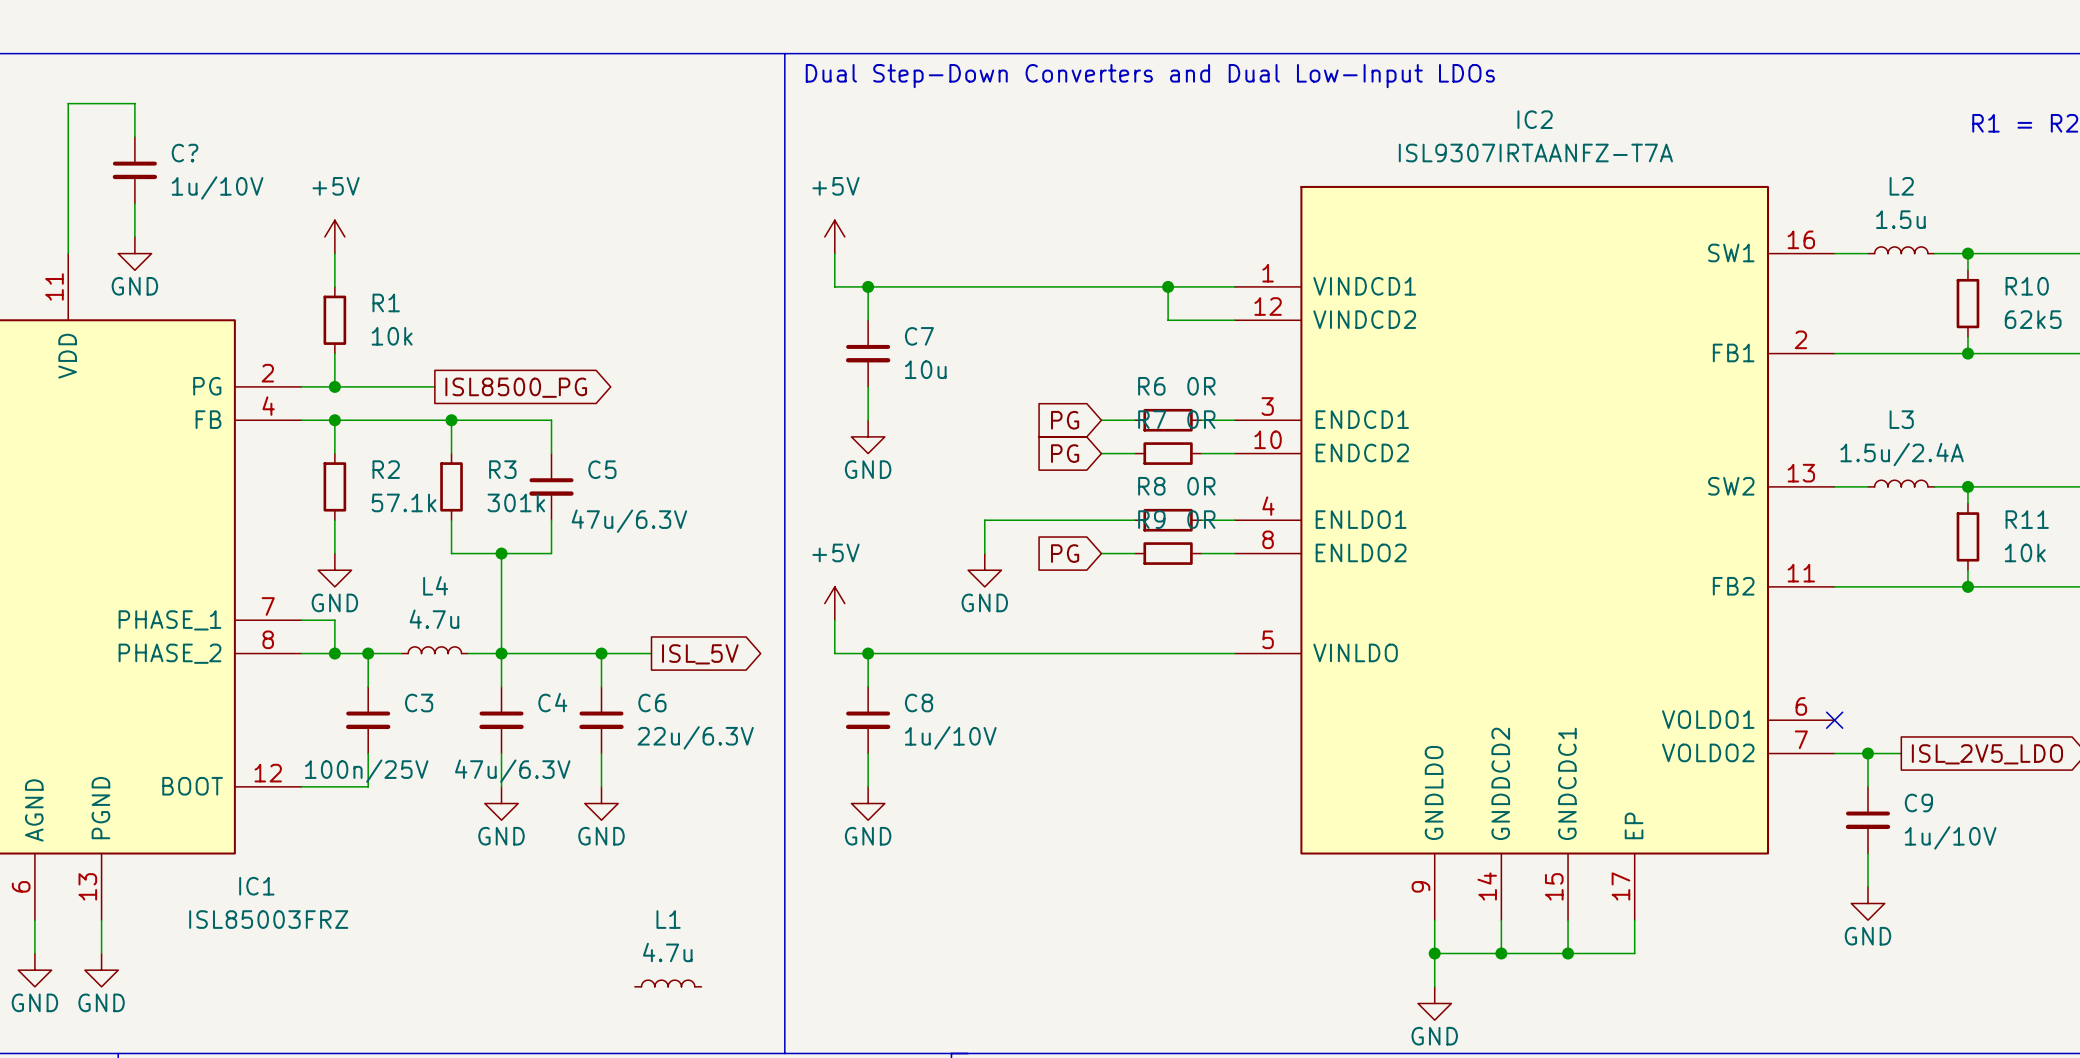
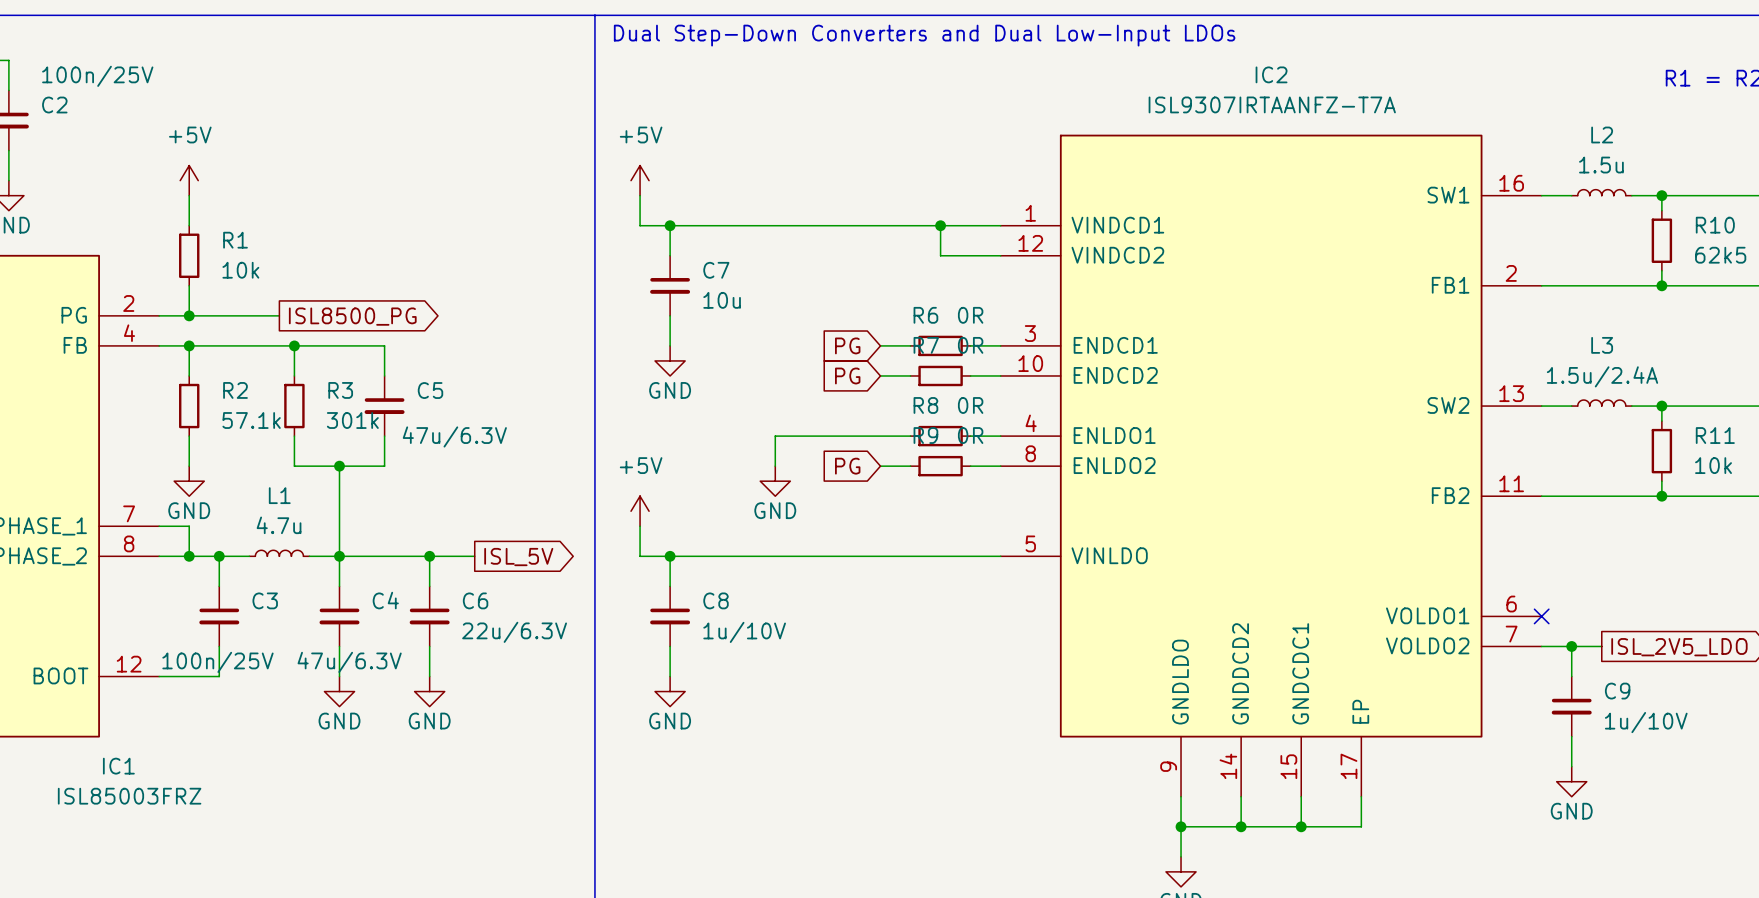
C? name: C? (185, 153) -> C2 (54, 105)
C? value: 1u/10V (217, 187) -> 100n/25V (97, 76)
L4 name: L4 (435, 585) -> L1 (279, 495)
L1: 4.7u (668, 983) -> none

